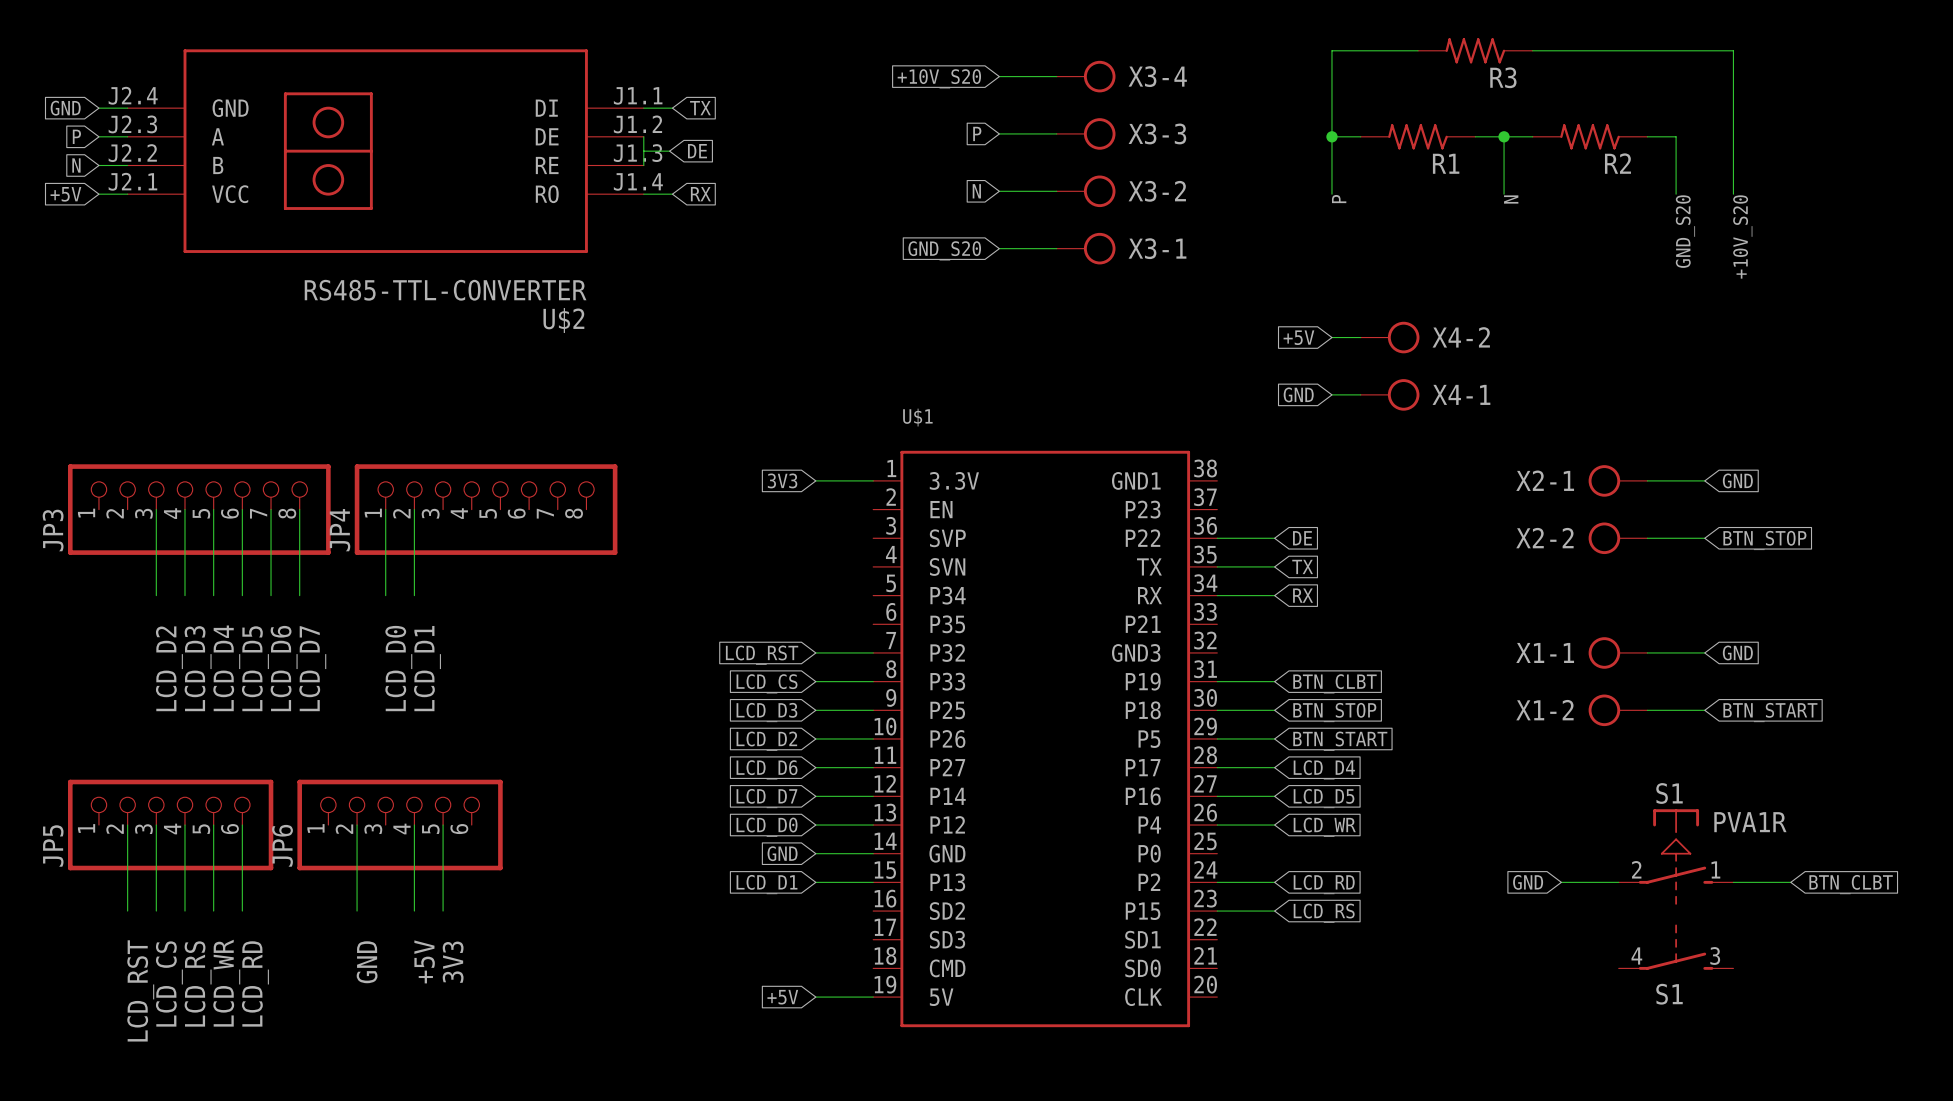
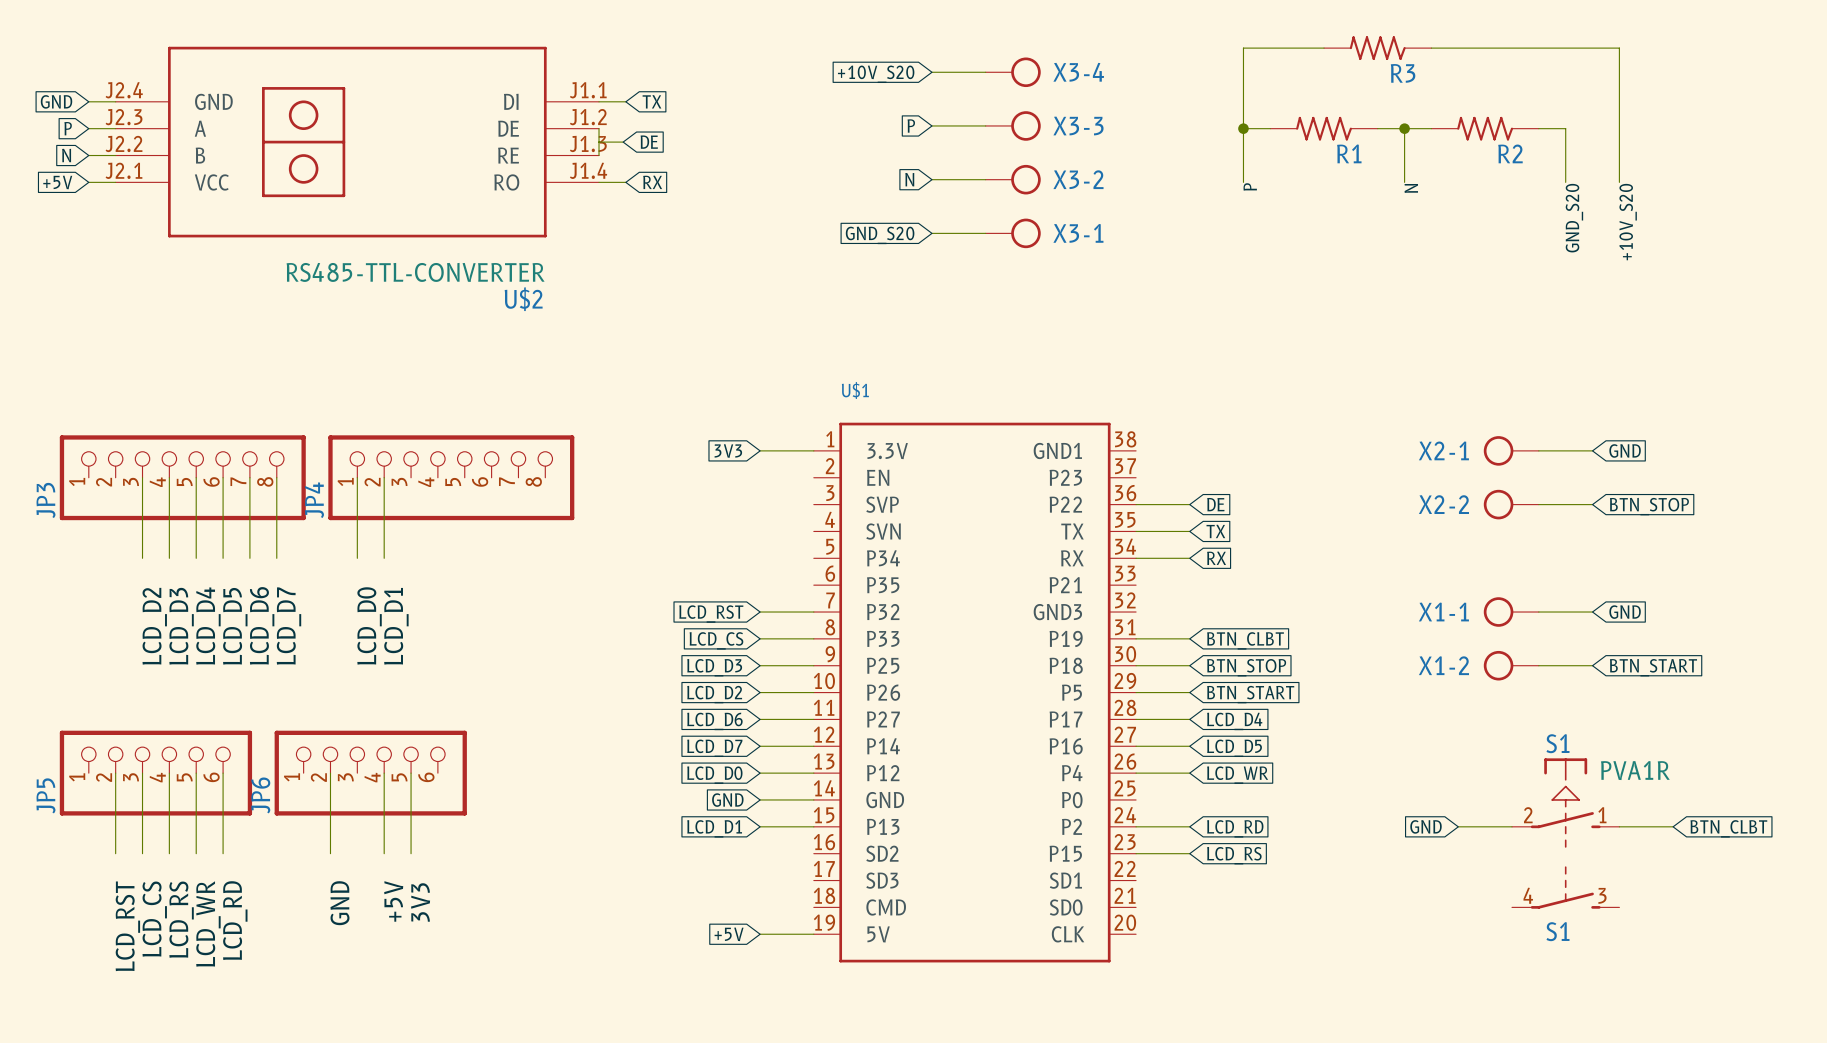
global label: +5V (1298, 337) -> none
wire: (1331, 337) (1360, 337) -> none
X4-2: (1390, 337) -> none
global label: GND (1298, 394) -> none
wire: (1331, 394) (1360, 394) -> none
X4-1: (1390, 394) -> none

